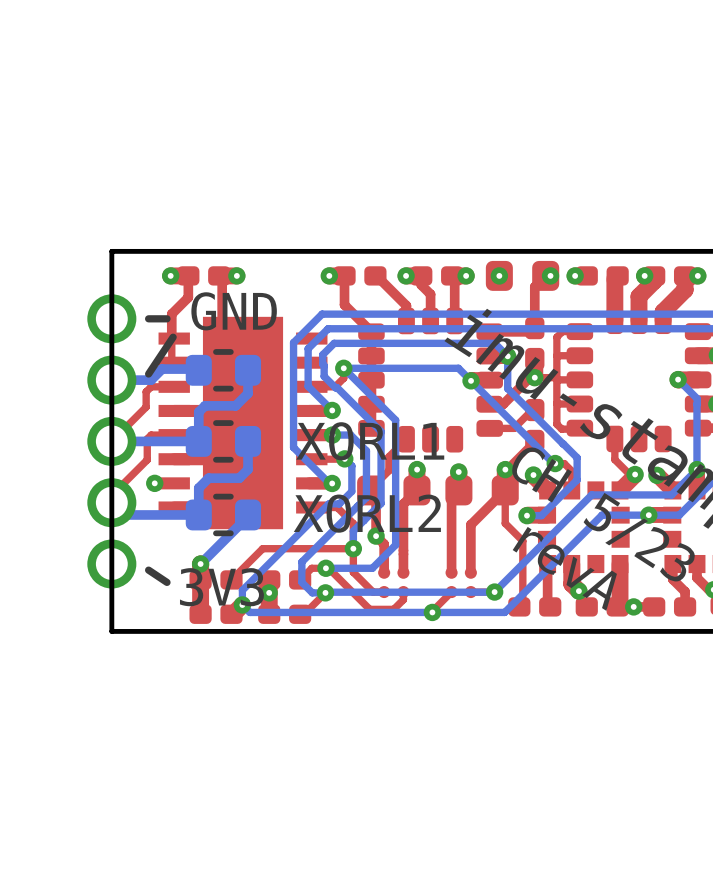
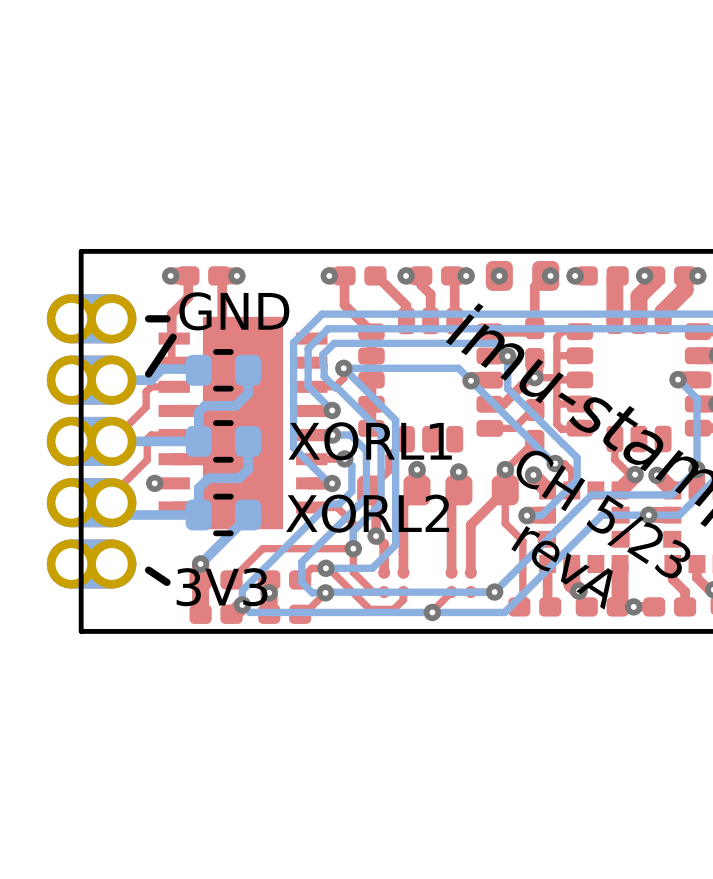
board edge: (111, 251) (111, 631) -> (111, 251) (81, 251) (81, 631) (111, 631)
part footprint: [87, 294, 137, 589] -> [46, 294, 137, 589]

